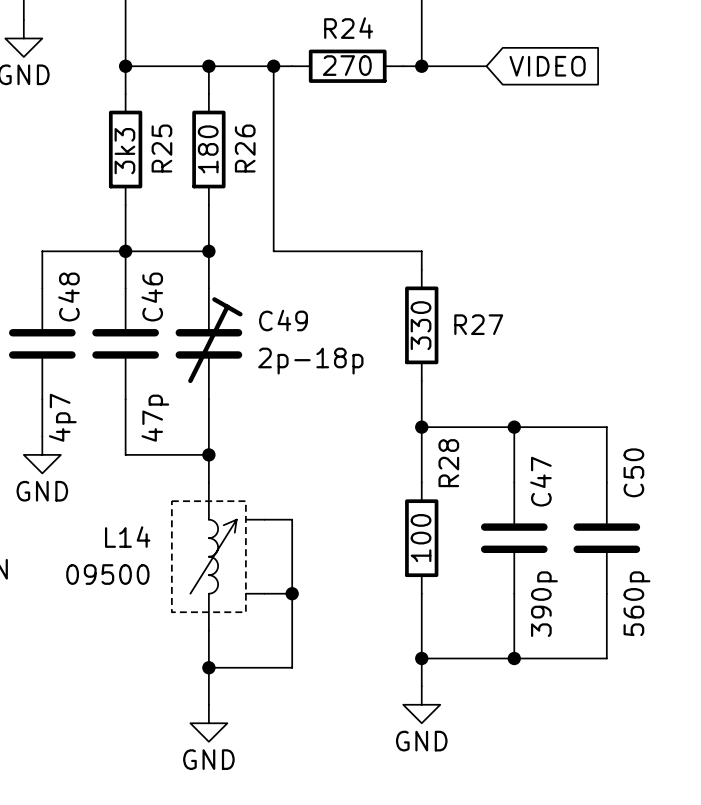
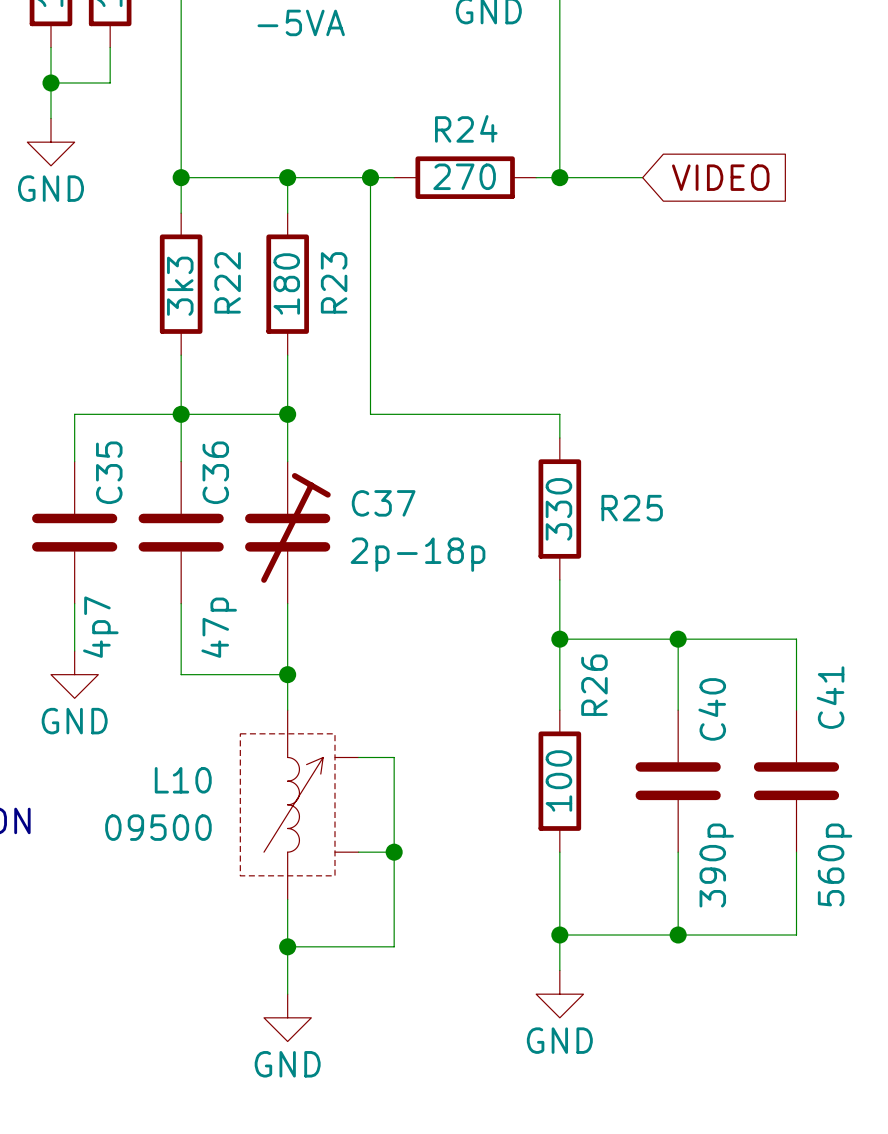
R25 name: R25 (161, 148) -> R22 (227, 282)
R26 name: R26 (245, 148) -> R23 (334, 282)
C48 name: C48 (68, 297) -> C35 (109, 472)
C46 name: C46 (152, 297) -> C36 (215, 472)
C49 name: C49 (283, 320) -> C37 (383, 503)
R27 name: R27 (478, 324) -> R25 (632, 508)
R28 name: R28 (448, 463) -> R26 (594, 685)
C50 name: C50 (633, 472) -> C41 (830, 697)
C47 name: C47 (540, 481) -> C40 (712, 709)
L14 name: L14 (127, 537) -> L10 (183, 780)

